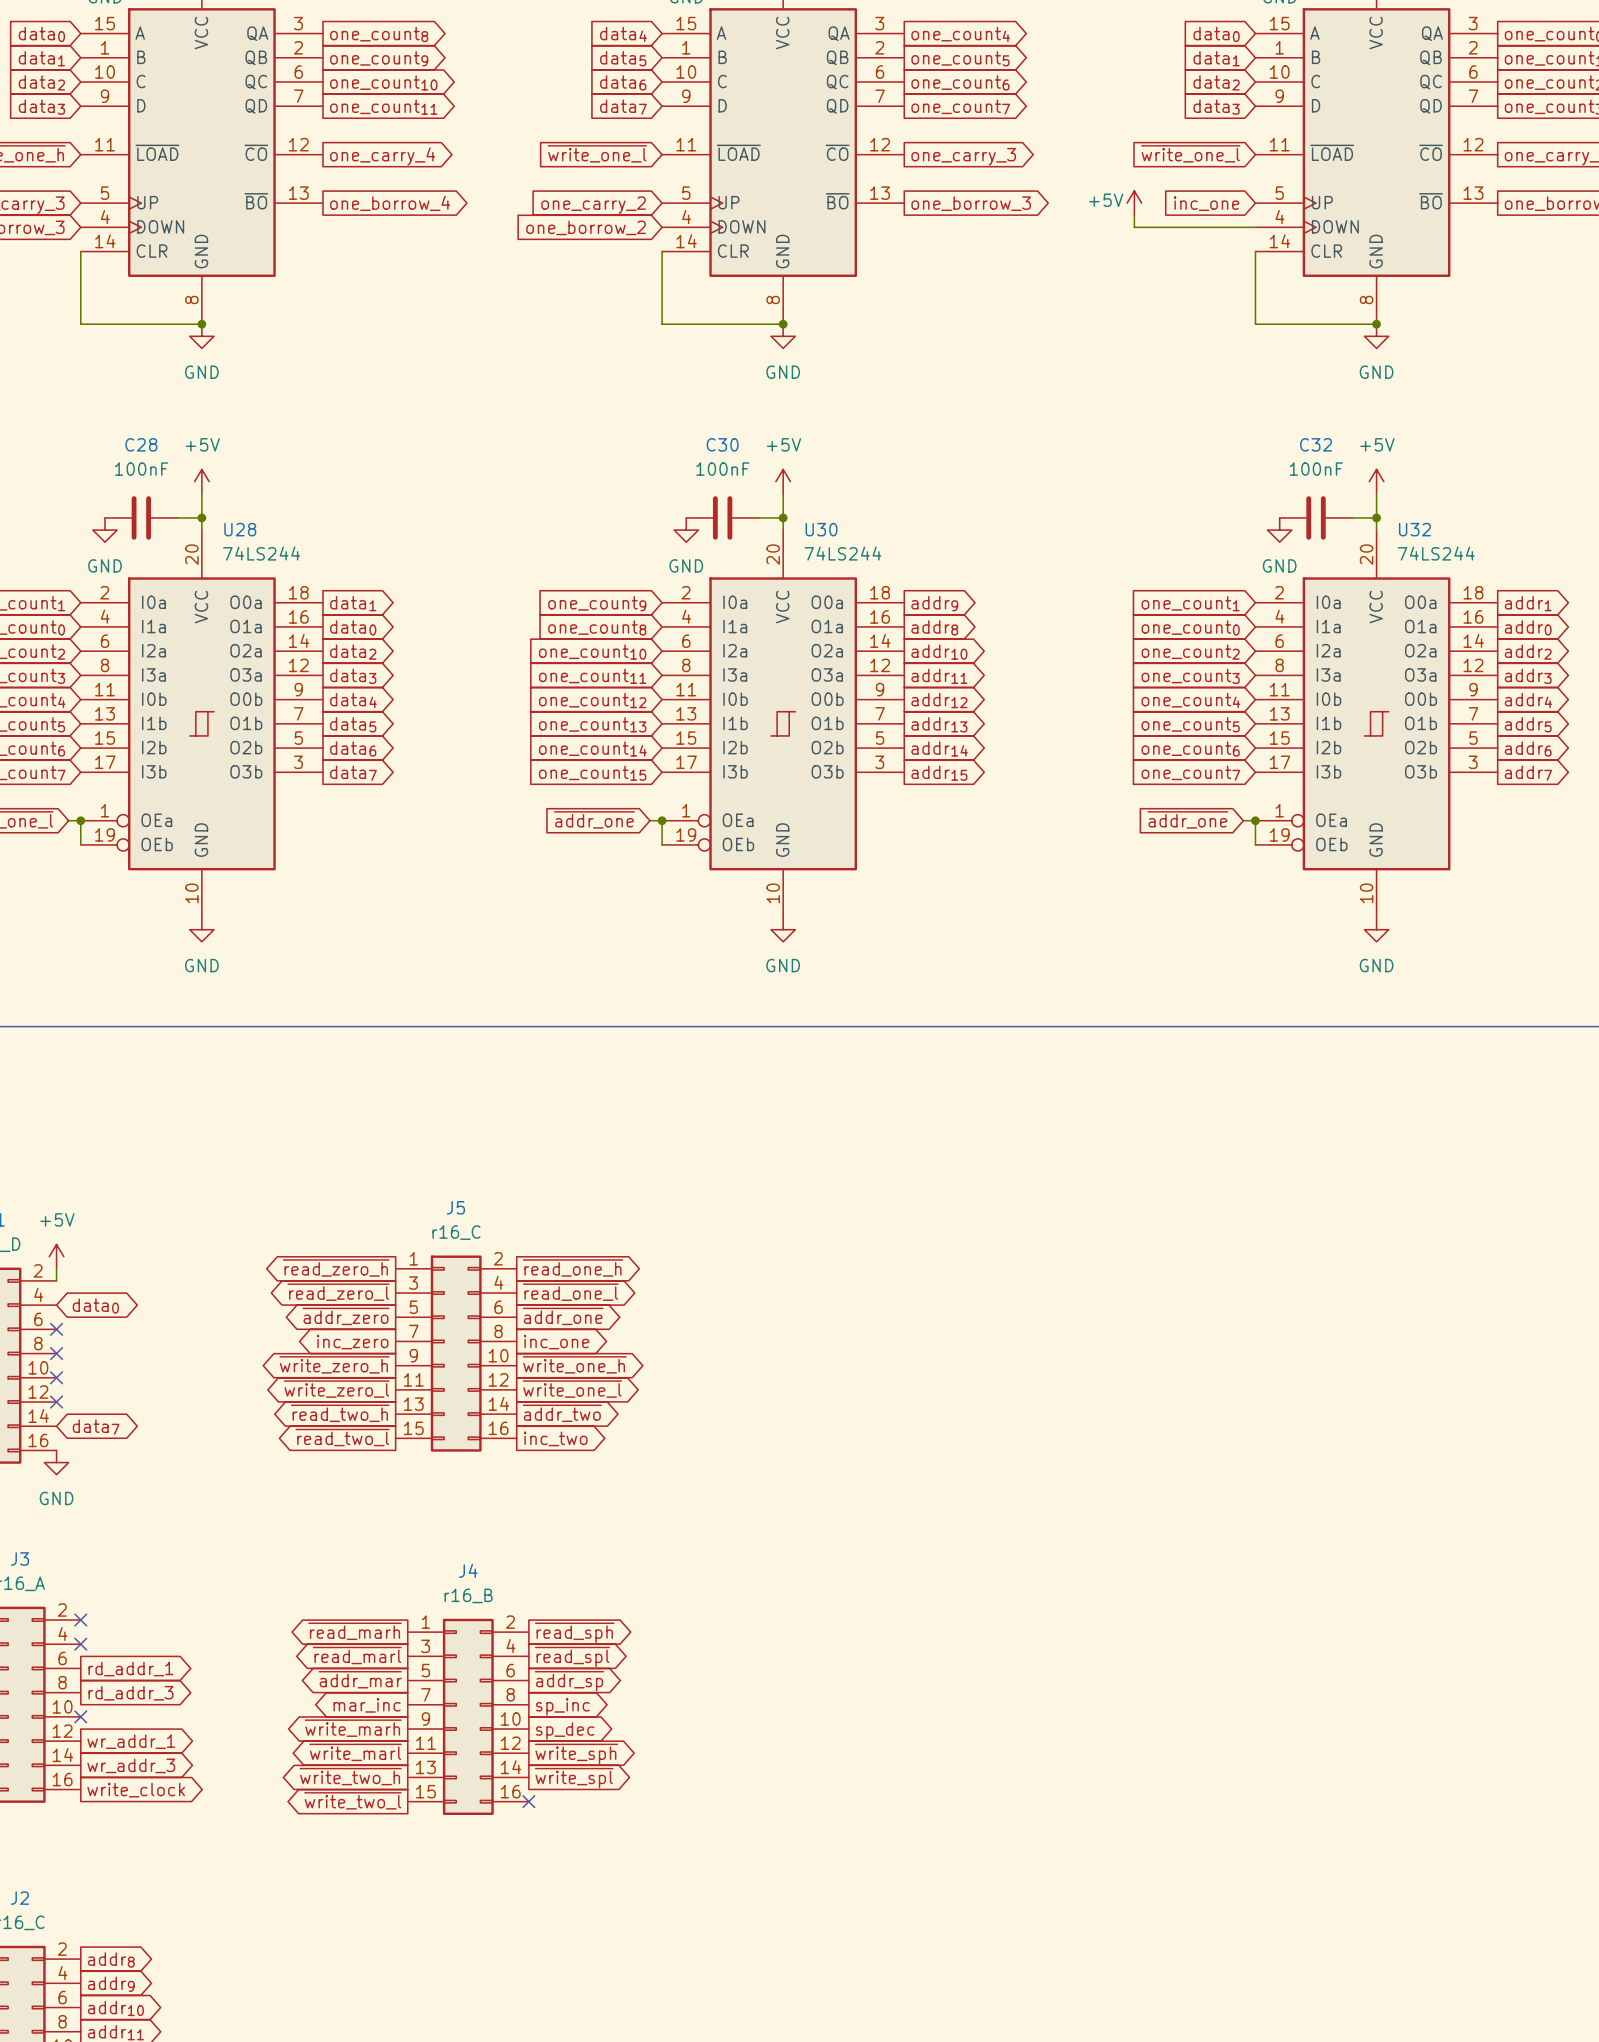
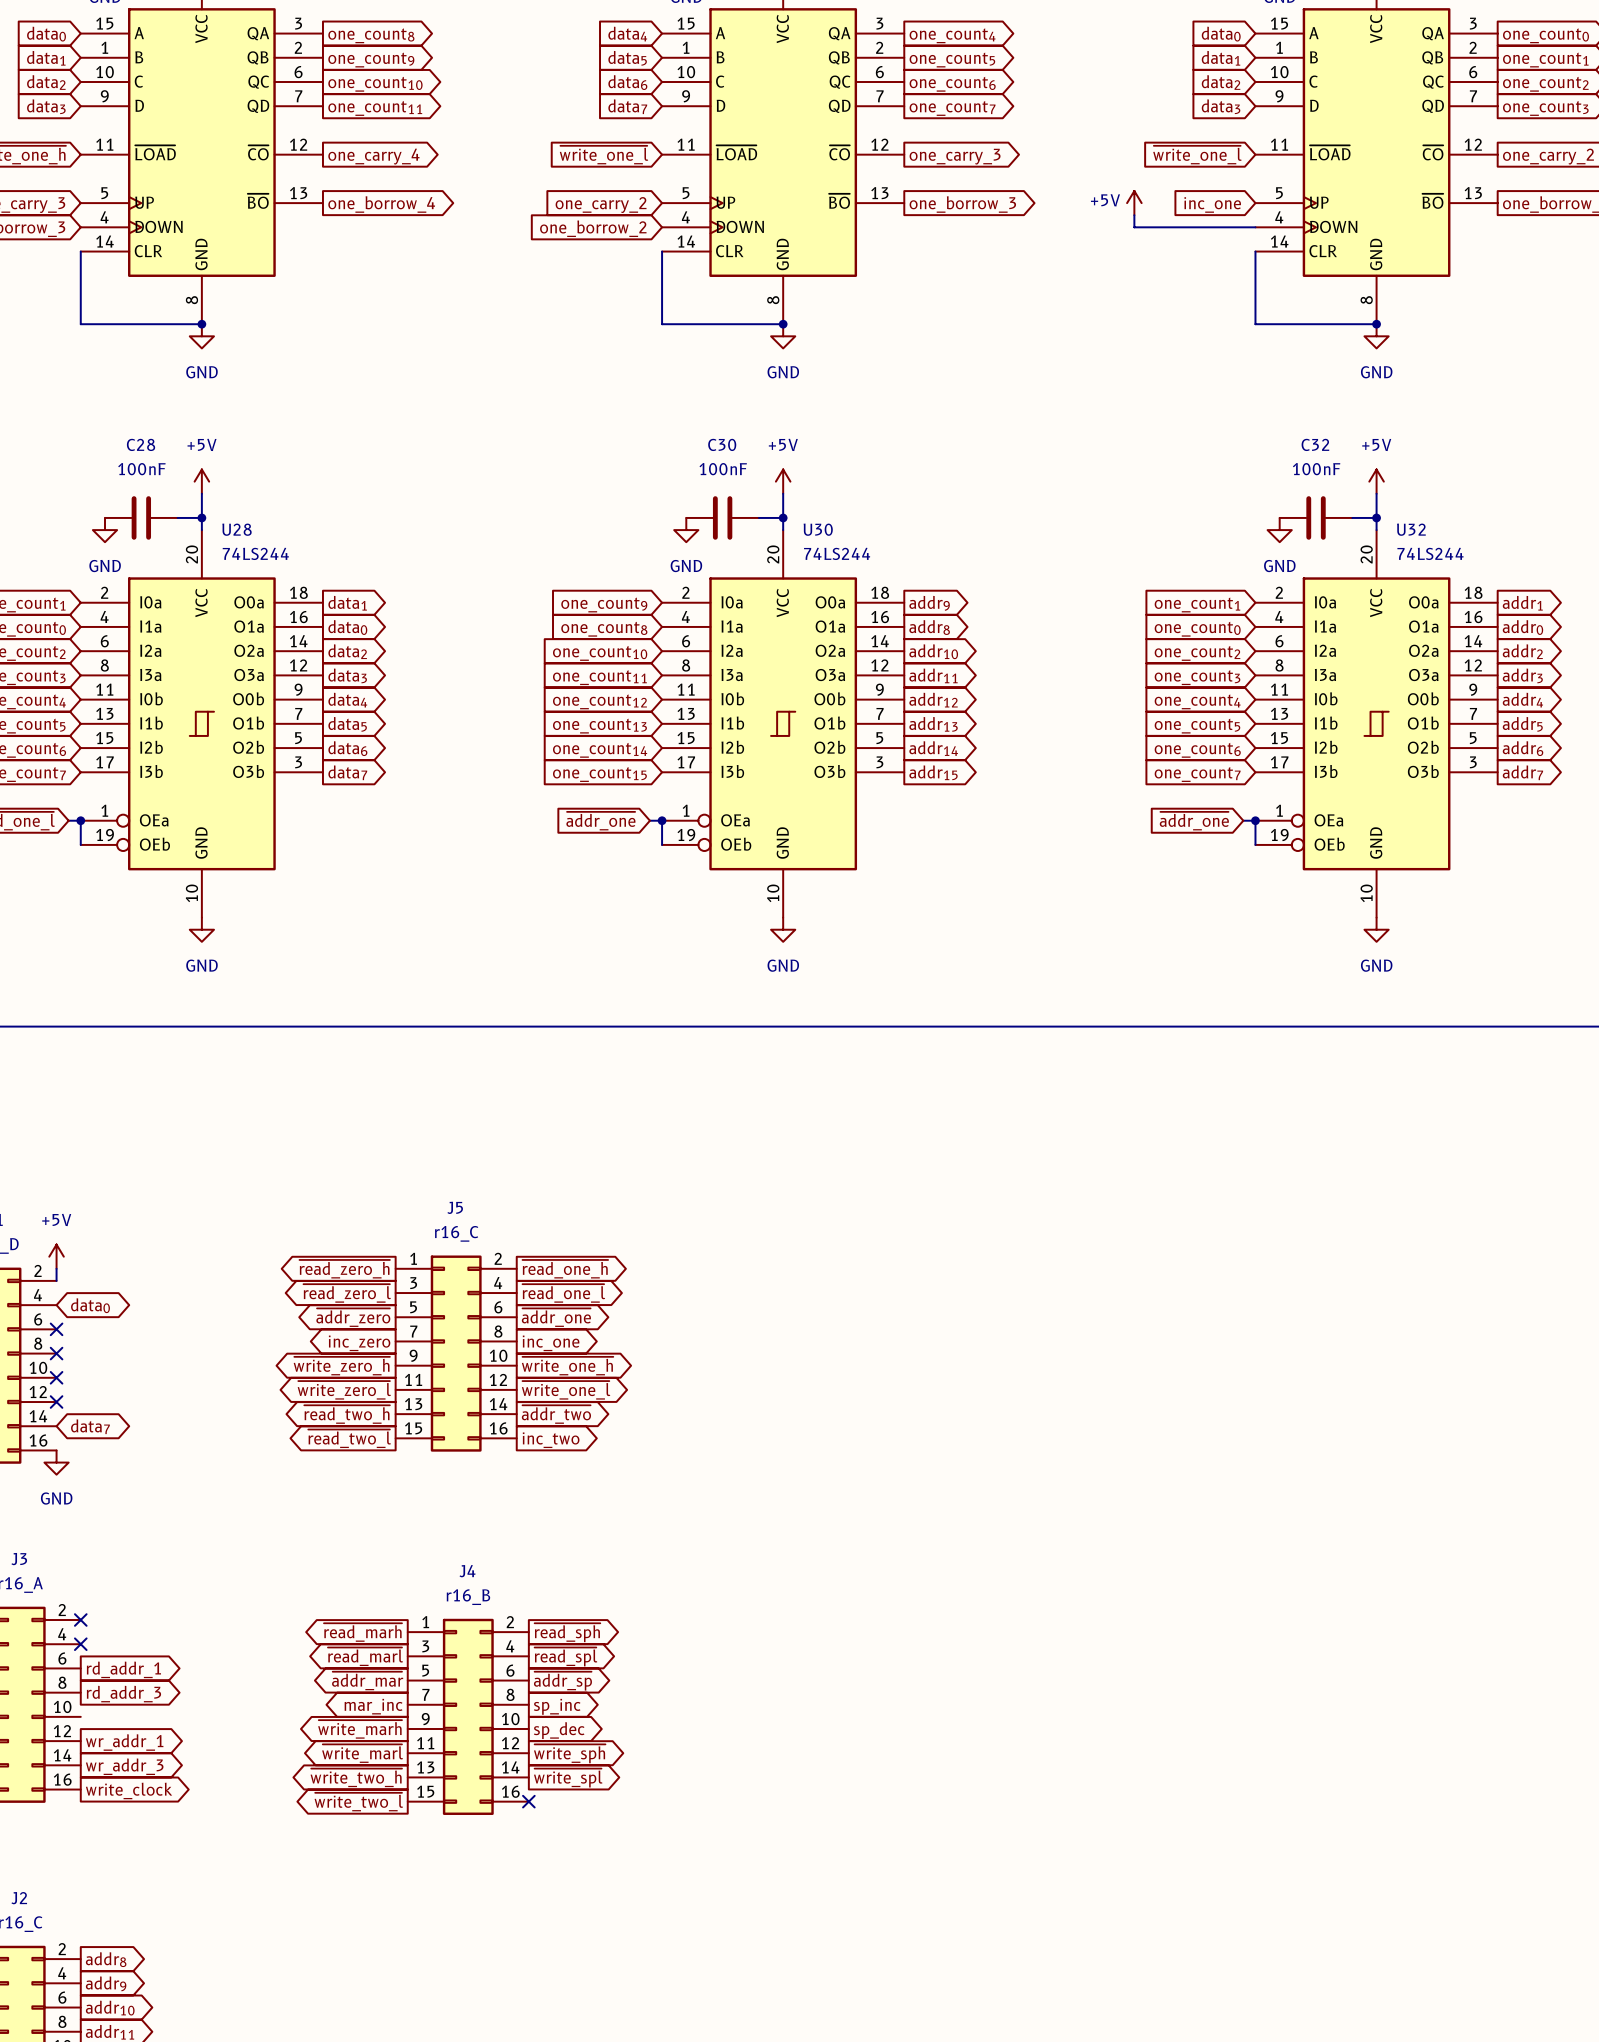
no-connect mark: (80, 1716) -> none

